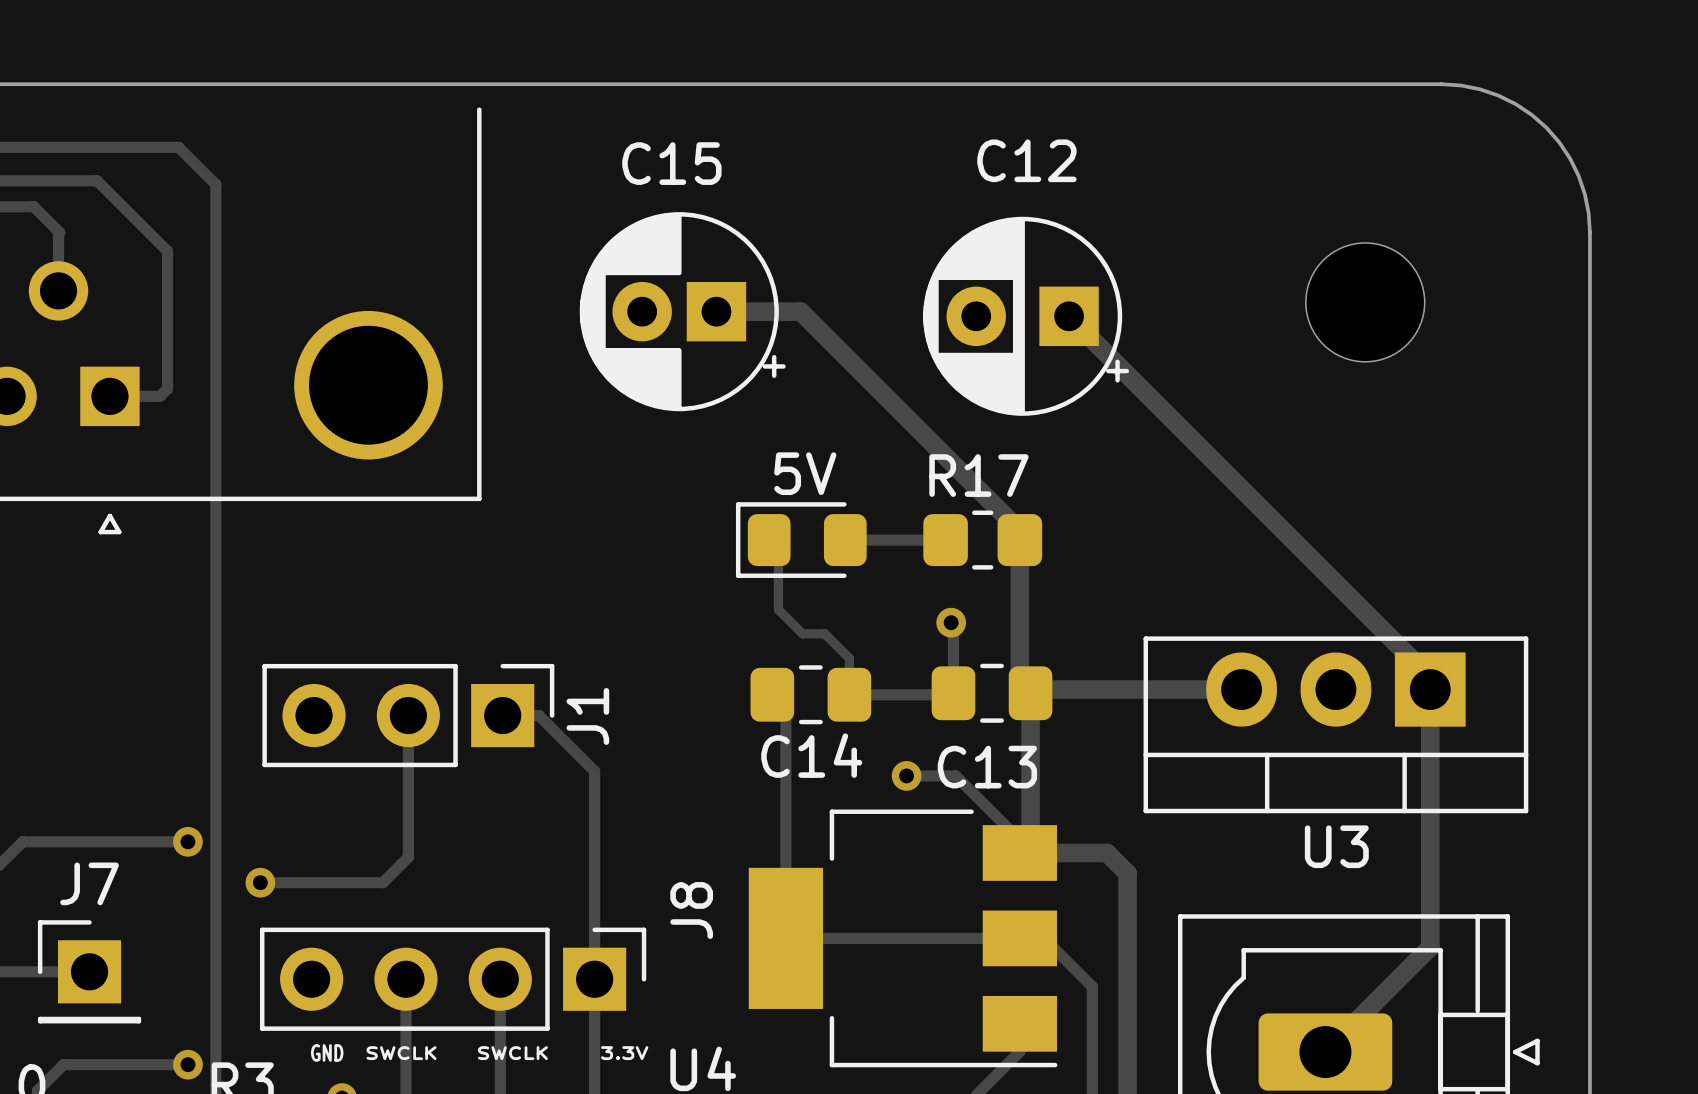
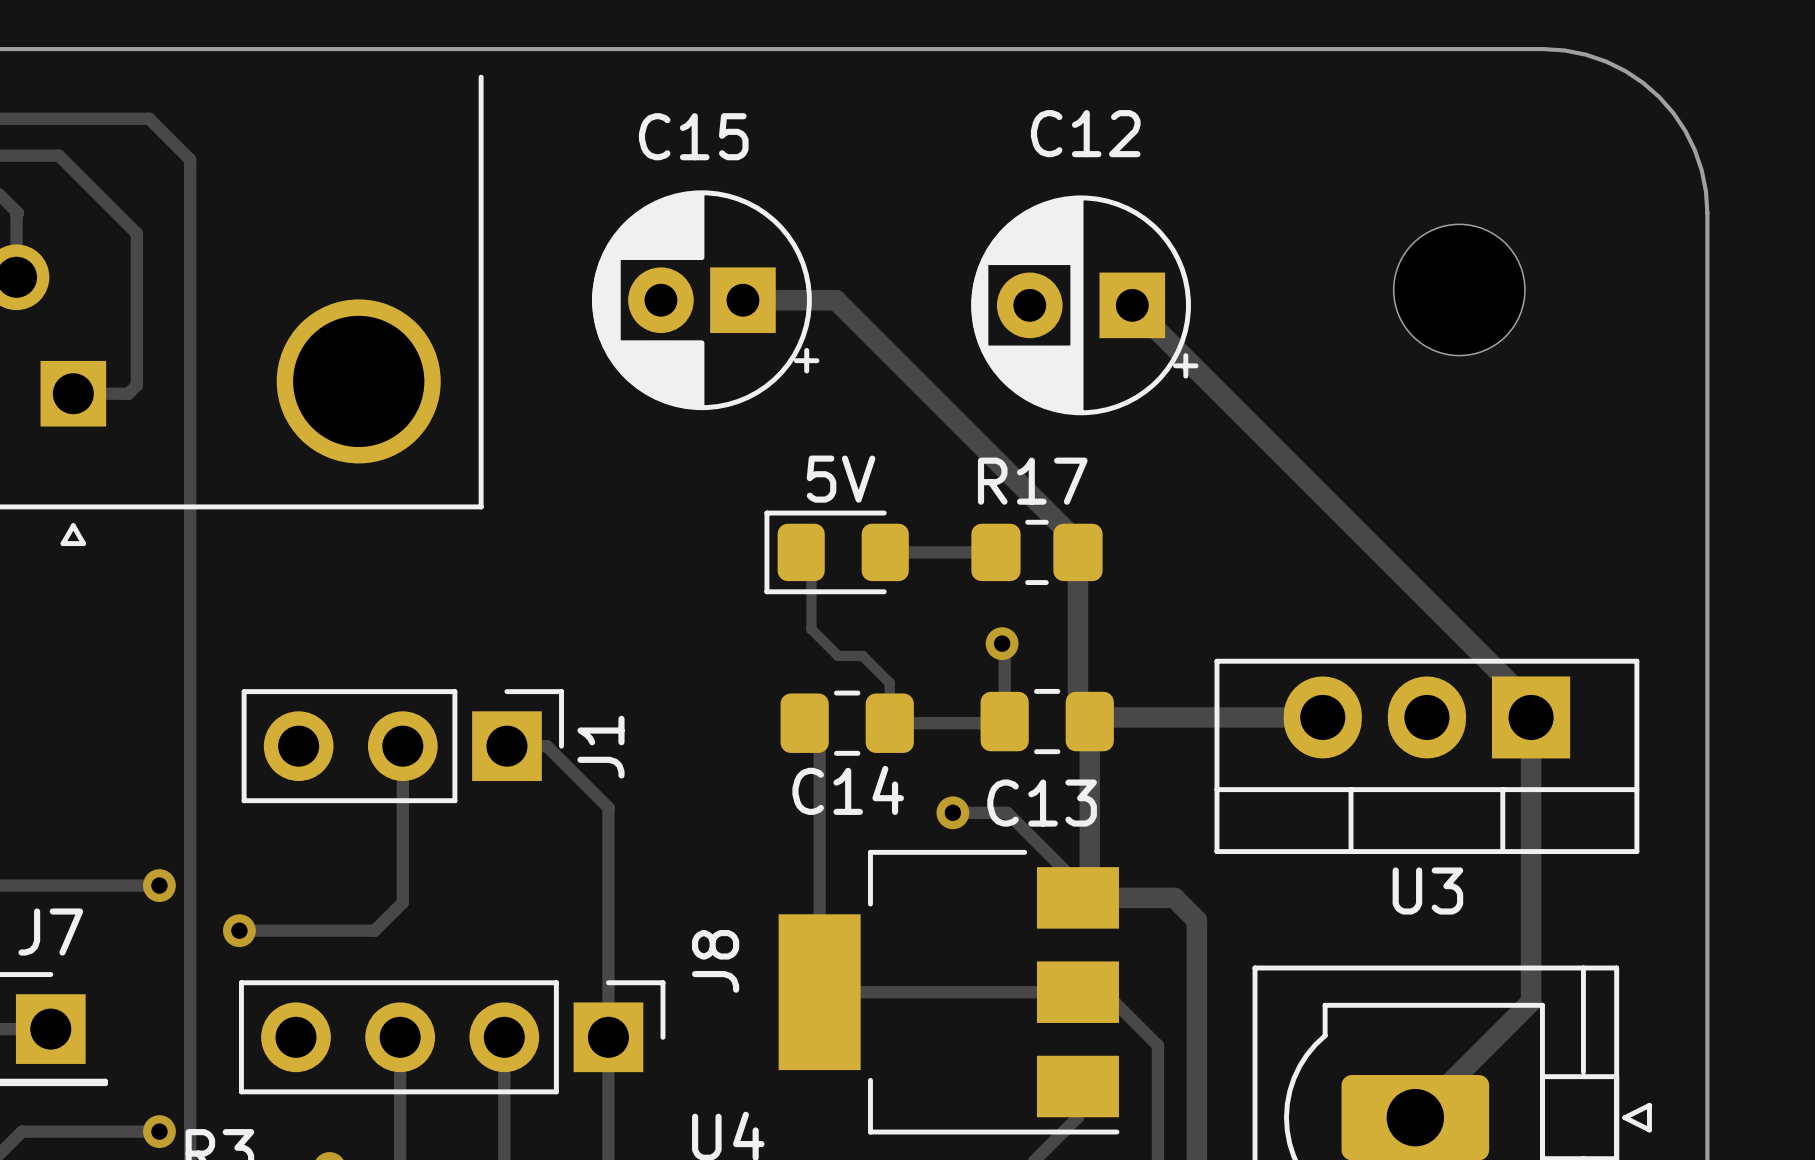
text: GND (327, 1052) -> none
text: SWCLK (401, 1053) -> none
text: SWCLK (512, 1053) -> none
text: 3.3V (624, 1053) -> none

